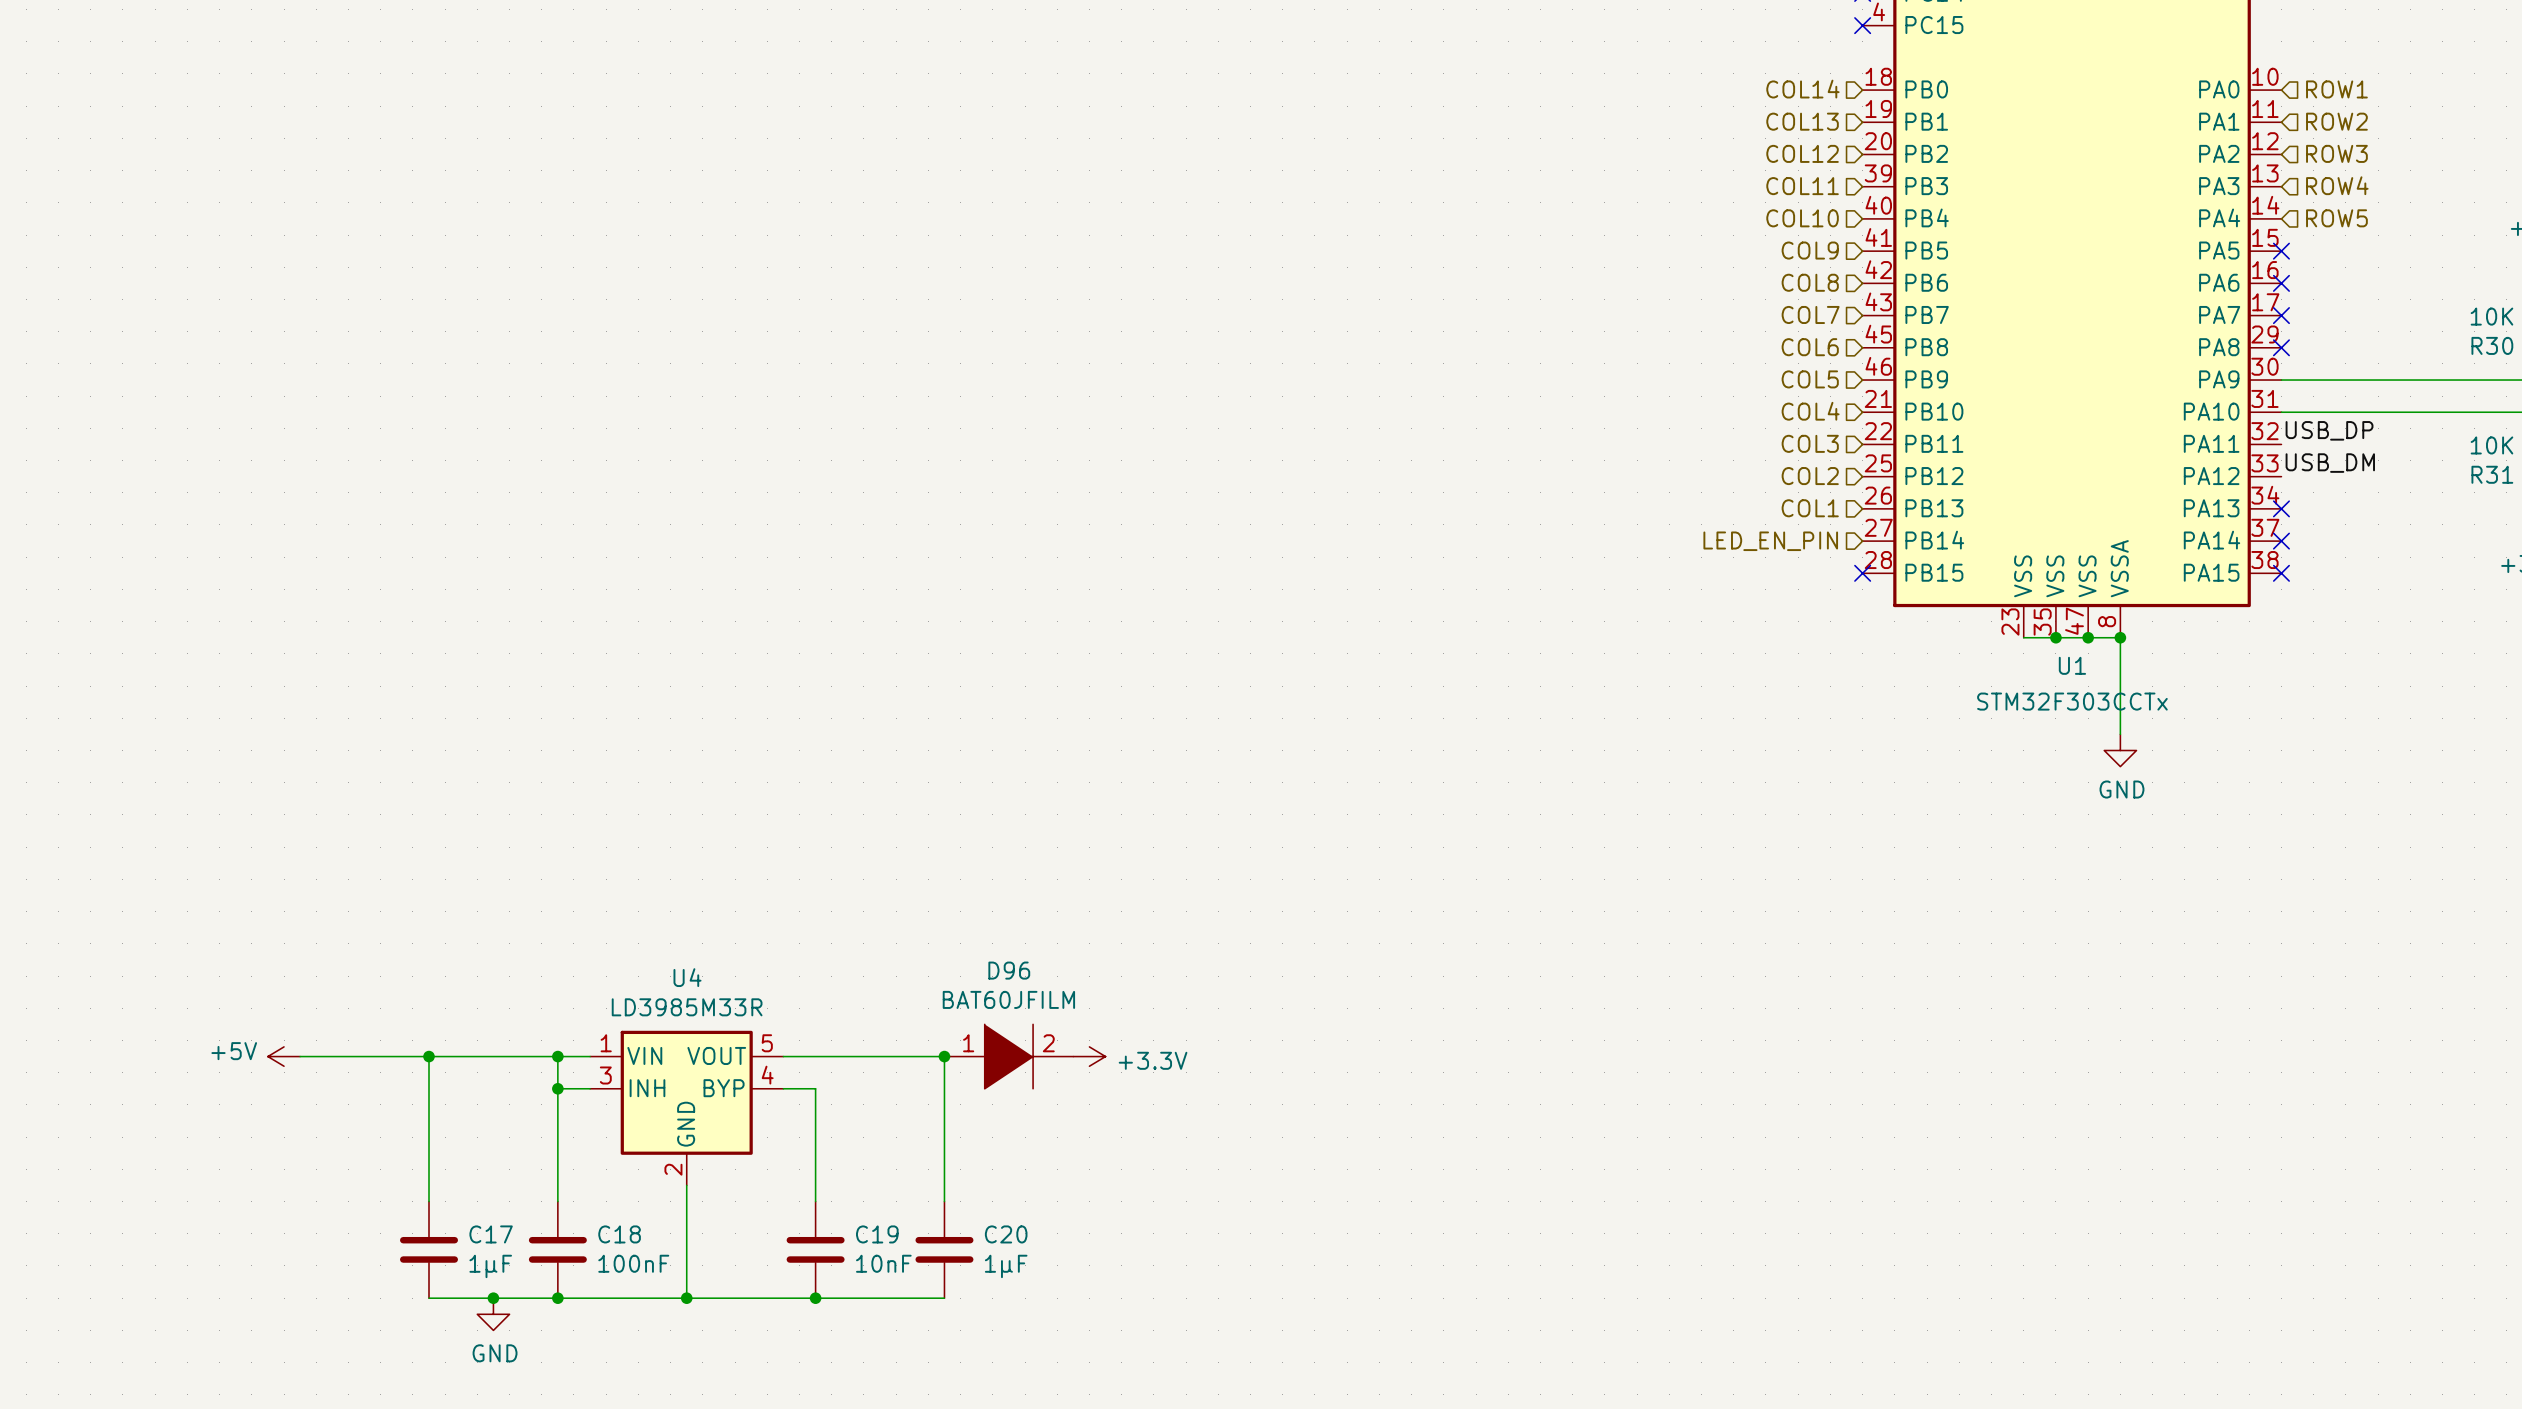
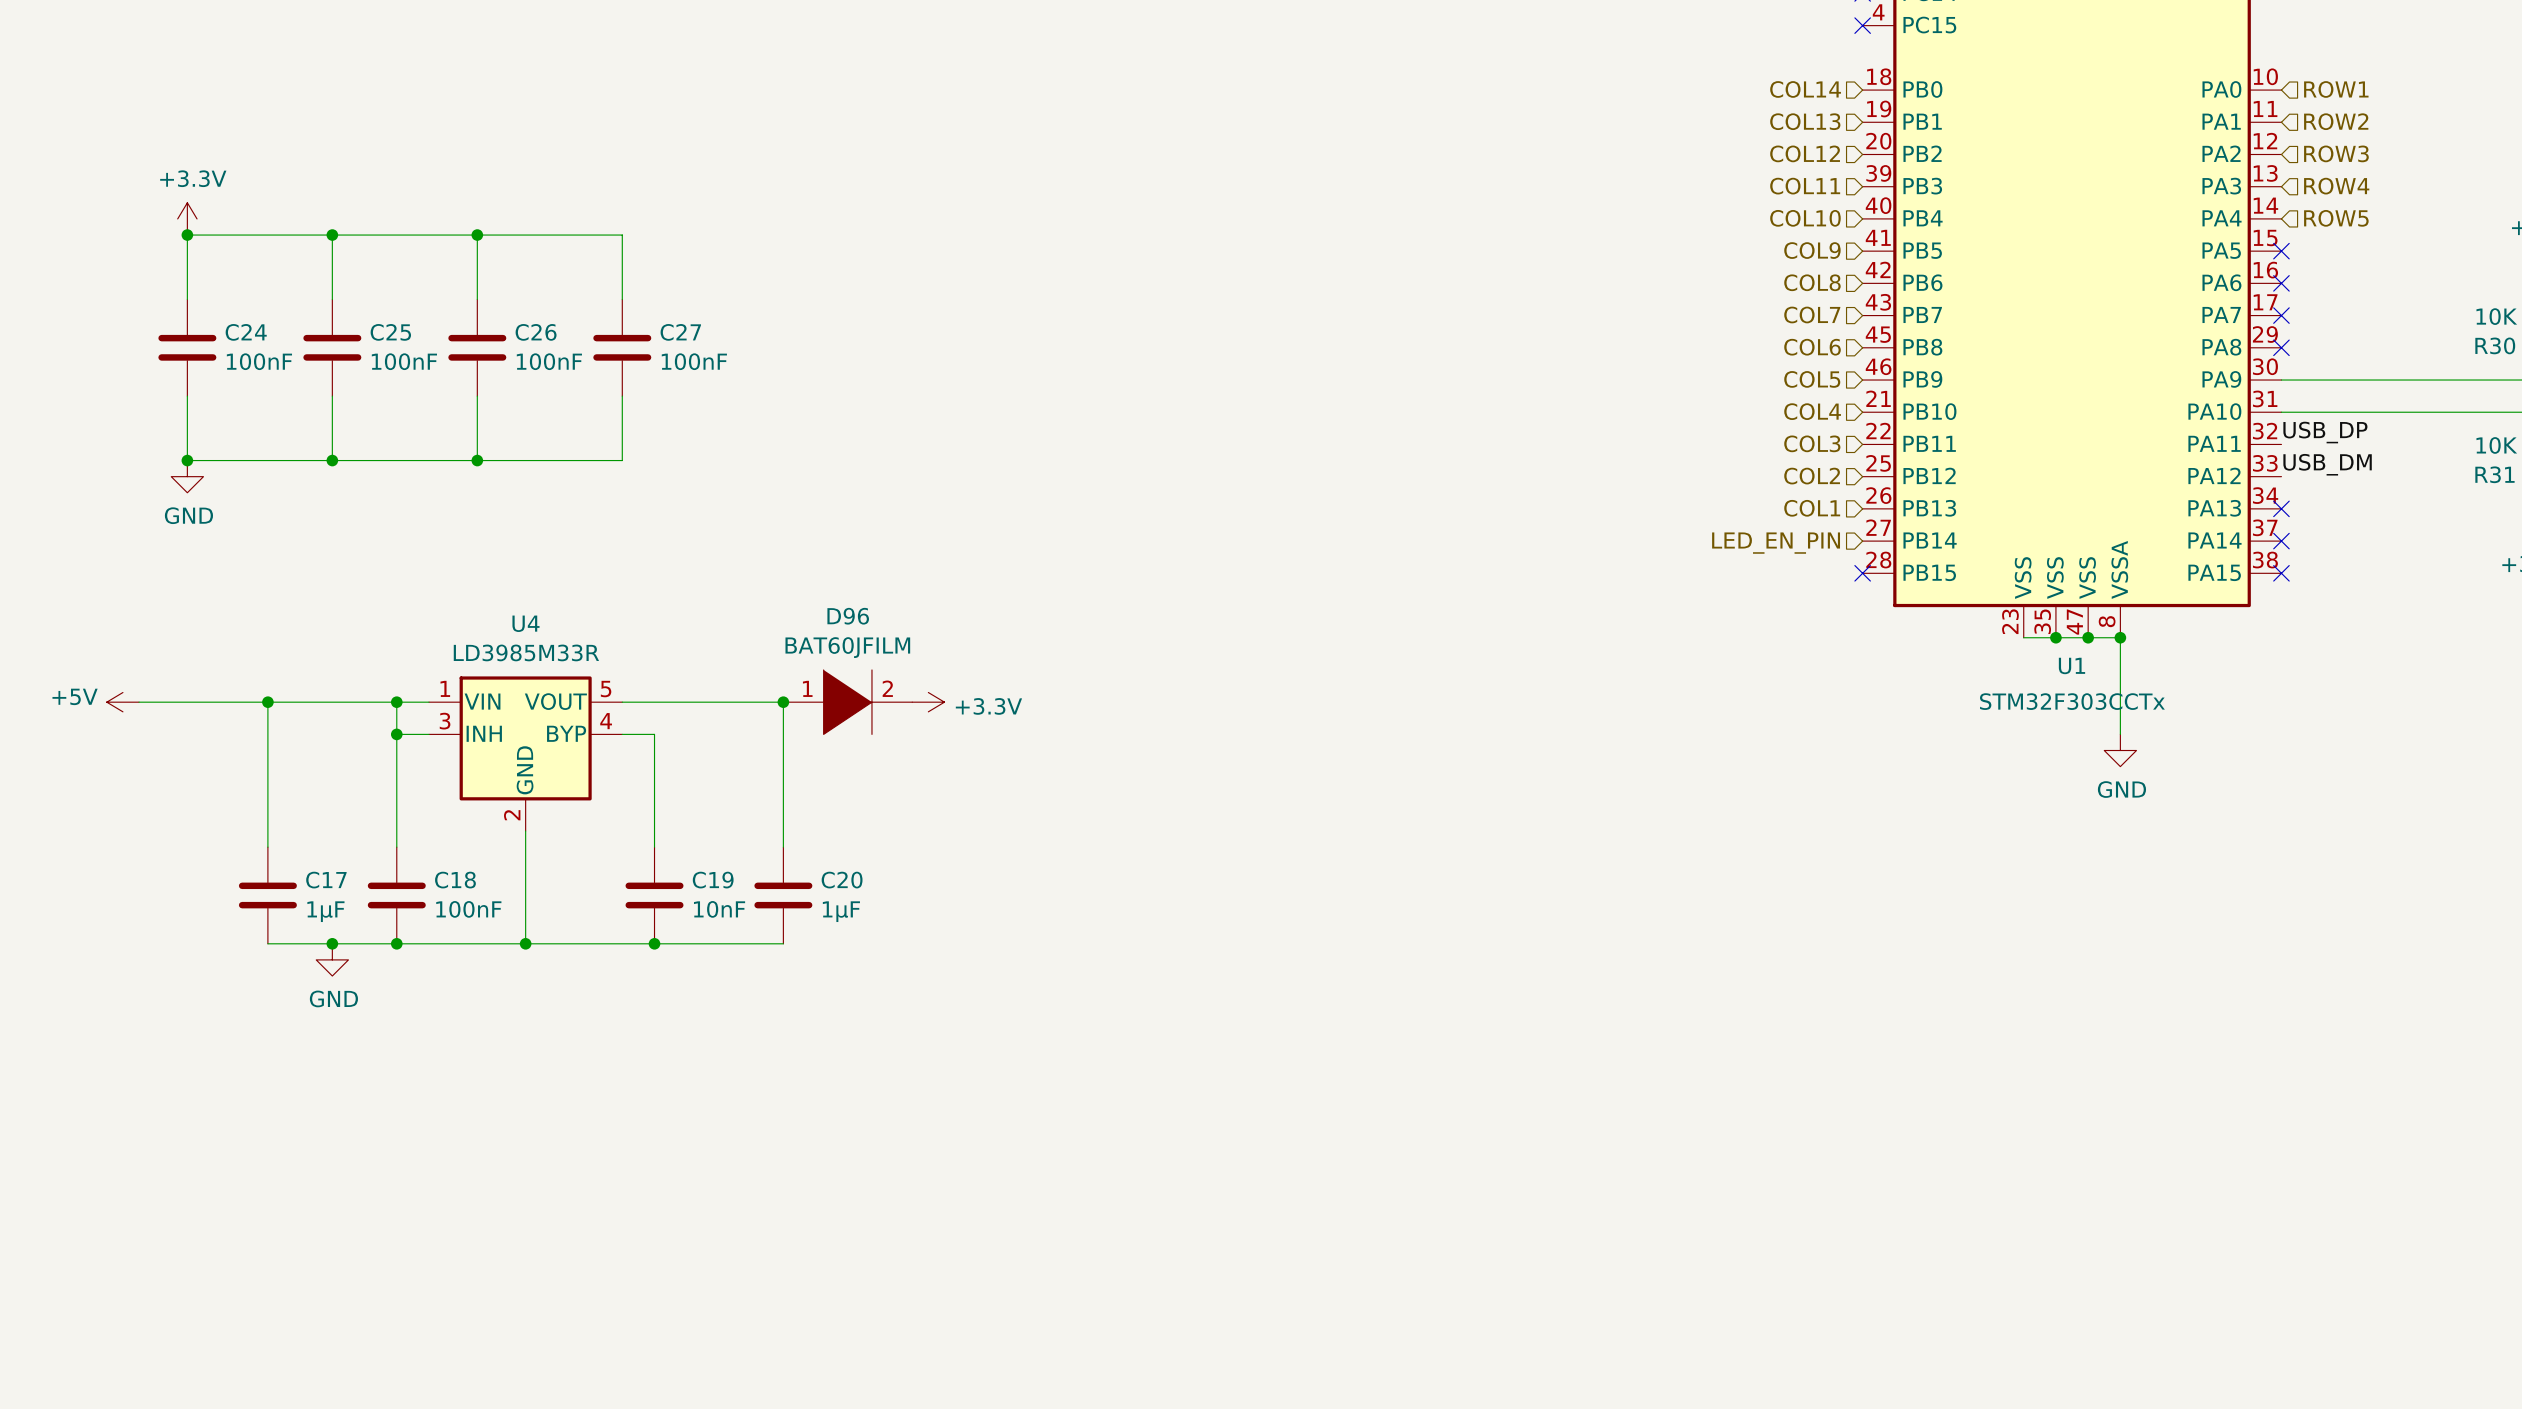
power symbol: none -> +3.3V (187, 218)
junction: none -> (187, 235)
wire: none -> (332, 235) (332, 299)
junction: none -> (332, 235)
wire: none -> (477, 235) (477, 299)
junction: none -> (477, 235)
wire: none -> (187, 299) (187, 235) (622, 235) (622, 299)
C24: none -> 100nF (187, 347)
C25: none -> 100nF (332, 347)
C26: none -> 100nF (477, 347)
C27: none -> 100nF (622, 347)
wire: none -> (187, 396) (187, 460) (622, 460) (622, 396)
wire: none -> (332, 396) (332, 460)
wire: none -> (477, 396) (477, 460)
junction: none -> (187, 460)
junction: none -> (332, 460)
junction: none -> (477, 460)
power symbol: none -> GND (187, 476)
power symbol: none -> +5V (122, 702)
wire: none -> (139, 702) (429, 702)
wire: none -> (267, 702) (267, 847)
junction: none -> (267, 702)
wire: none -> (396, 702) (396, 847)
junction: none -> (396, 702)
wire: none -> (622, 702) (783, 702) (783, 847)
junction: none -> (783, 702)
power symbol: none -> +3.3V (928, 702)
wire: none -> (396, 734) (429, 734)
junction: none -> (396, 734)
wire: none -> (622, 734) (654, 734) (654, 847)
wire: none -> (525, 831) (525, 943)
wire: none -> (267, 943) (783, 943)
junction: none -> (332, 943)
junction: none -> (396, 943)
junction: none -> (525, 943)
junction: none -> (654, 943)
power symbol: none -> GND (332, 959)
power symbol: +5V (284, 1056) -> none
wire: (300, 1056) (590, 1056) -> none
wire: (429, 1056) (429, 1201) -> none
junction: (429, 1056) -> none
wire: (557, 1056) (557, 1201) -> none
junction: (557, 1056) -> none
wire: (783, 1056) (944, 1056) (944, 1201) -> none
junction: (944, 1056) -> none
D96 position: (1008, 1056) -> (847, 702)
power symbol: +3.3V (1089, 1056) -> none
wire: (557, 1088) (590, 1088) -> none
junction: (557, 1088) -> none
wire: (783, 1088) (815, 1088) (815, 1201) -> none
U4 position: (686, 1108) -> (525, 753)
wire: (686, 1185) (686, 1298) -> none
C17 position: (429, 1249) -> (267, 895)
C18 position: (557, 1249) -> (396, 895)
C19 position: (815, 1249) -> (654, 895)
C20 position: (944, 1249) -> (783, 895)
wire: (429, 1298) (944, 1298) -> none
junction: (493, 1298) -> none
junction: (557, 1298) -> none
junction: (686, 1298) -> none
junction: (815, 1298) -> none
power symbol: GND (493, 1314) -> none

